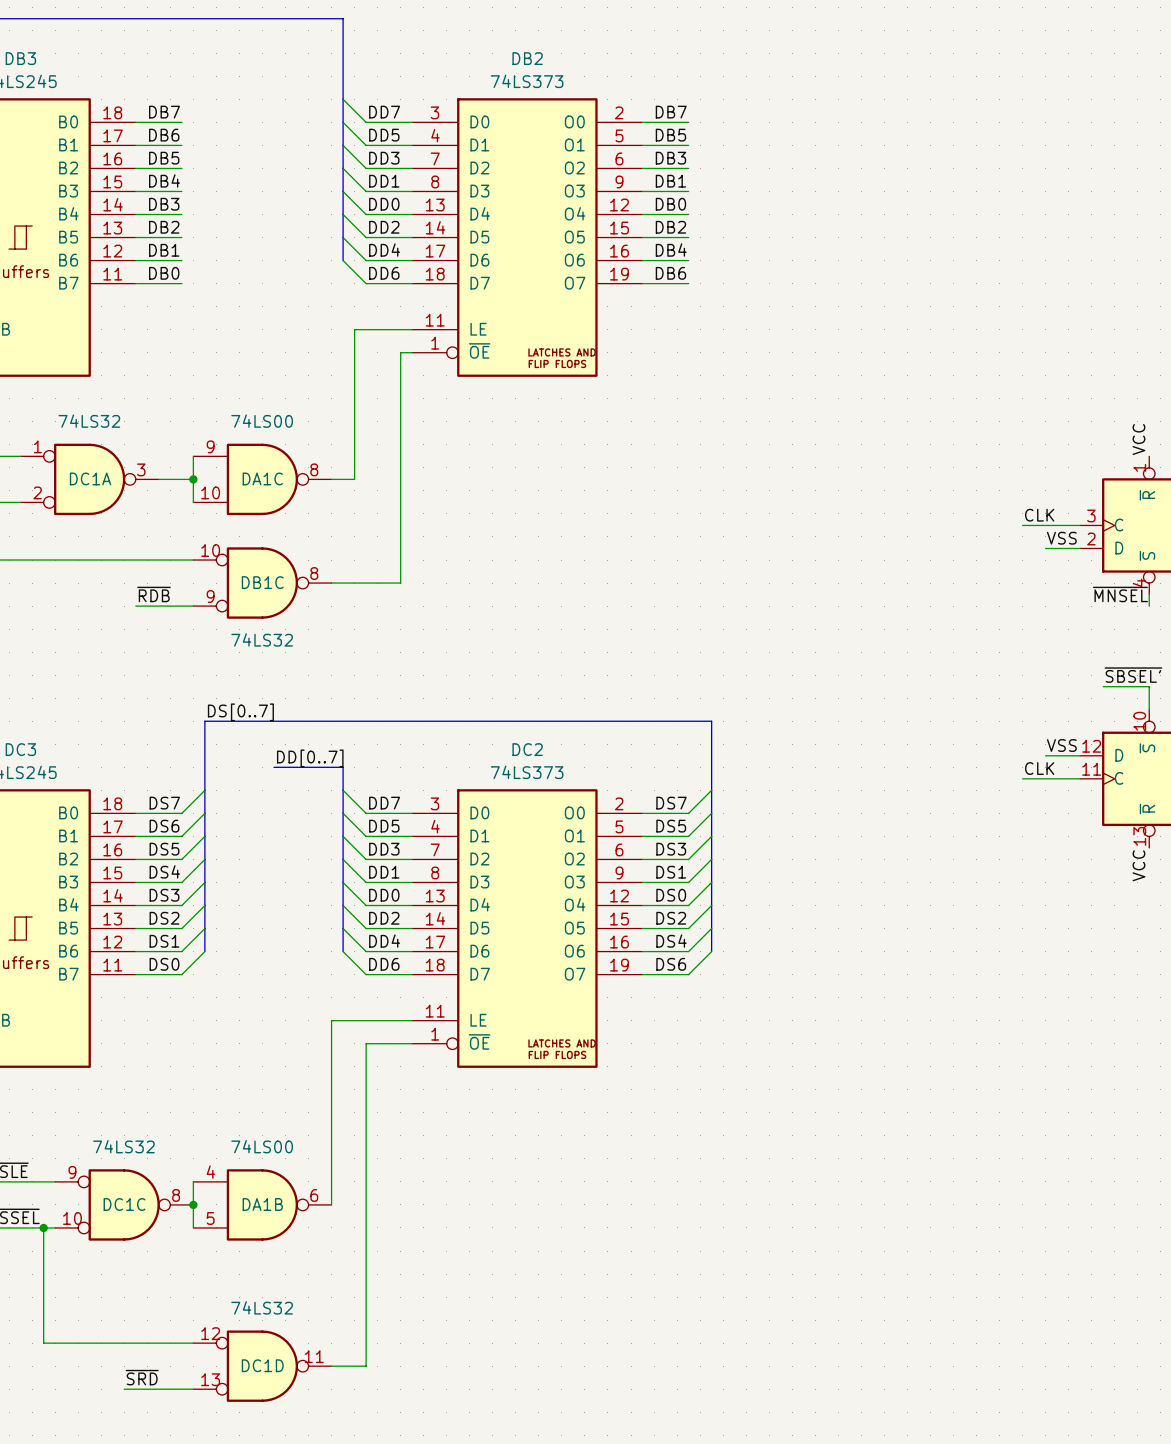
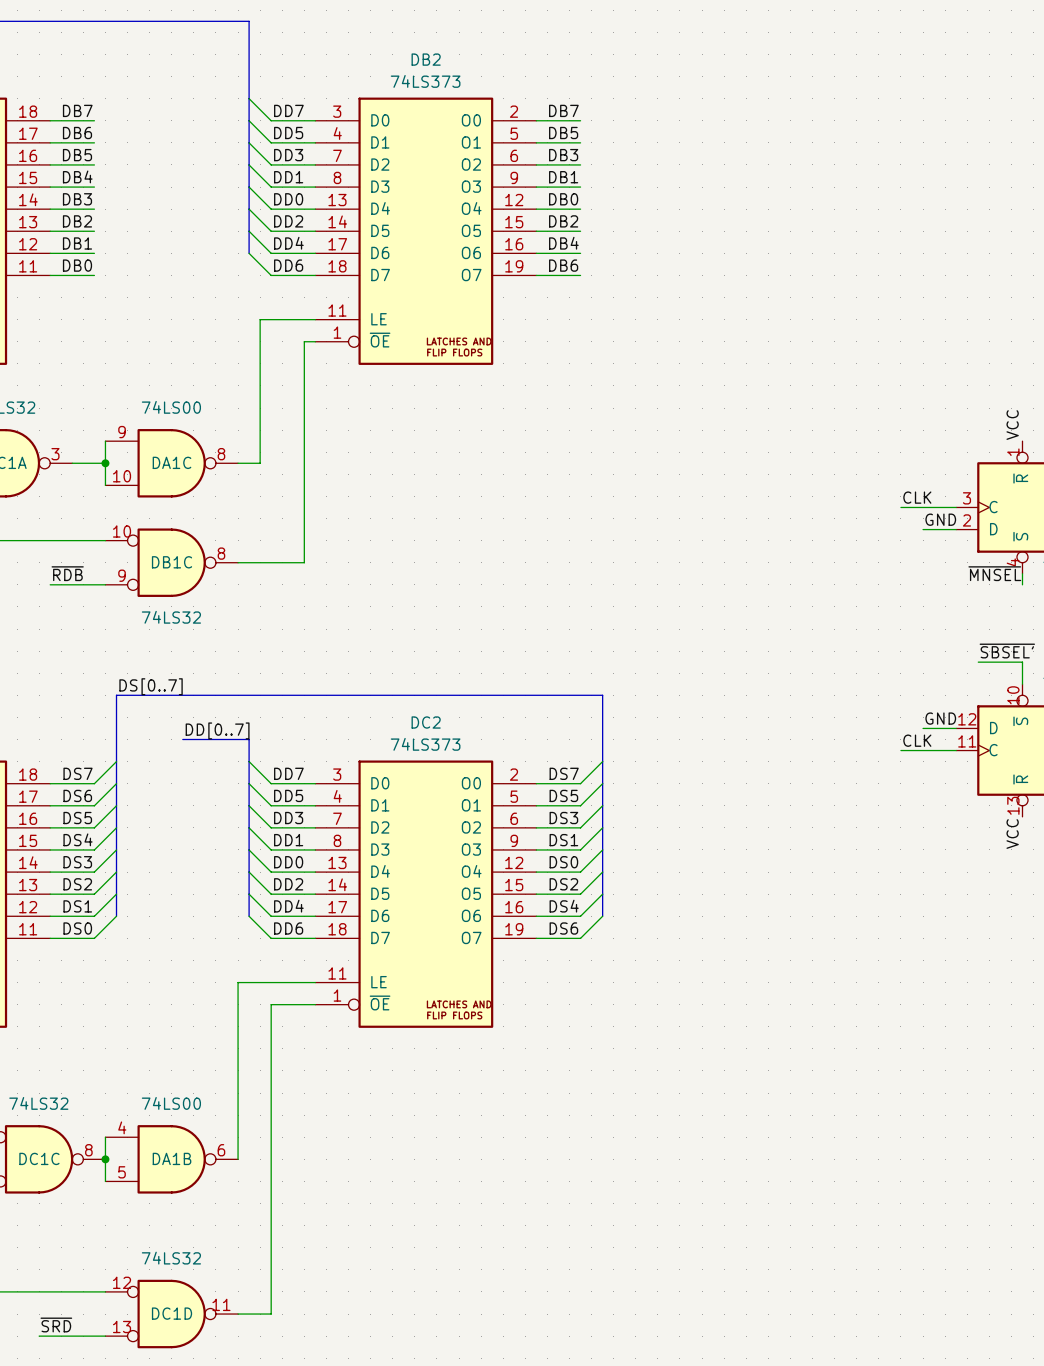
label: VSS (1061, 538) -> GND (940, 519)
label: VSS (1061, 745) -> GND (940, 718)

